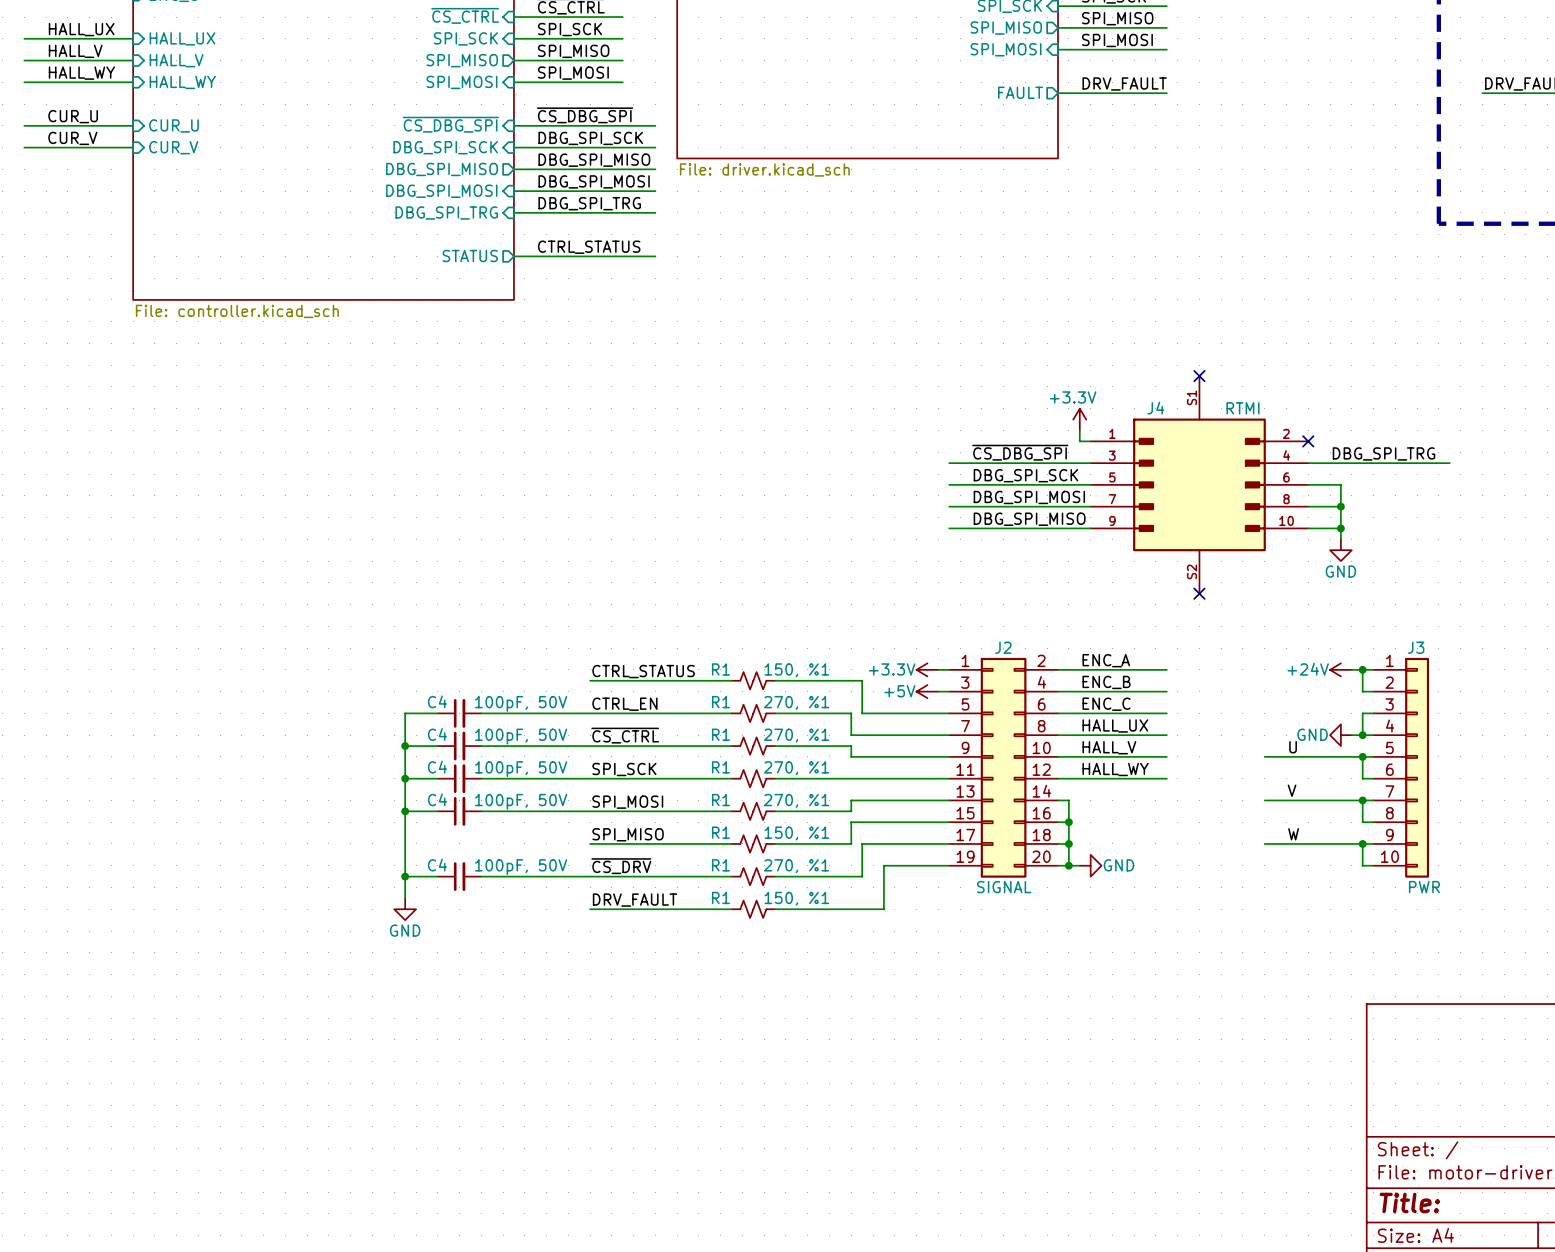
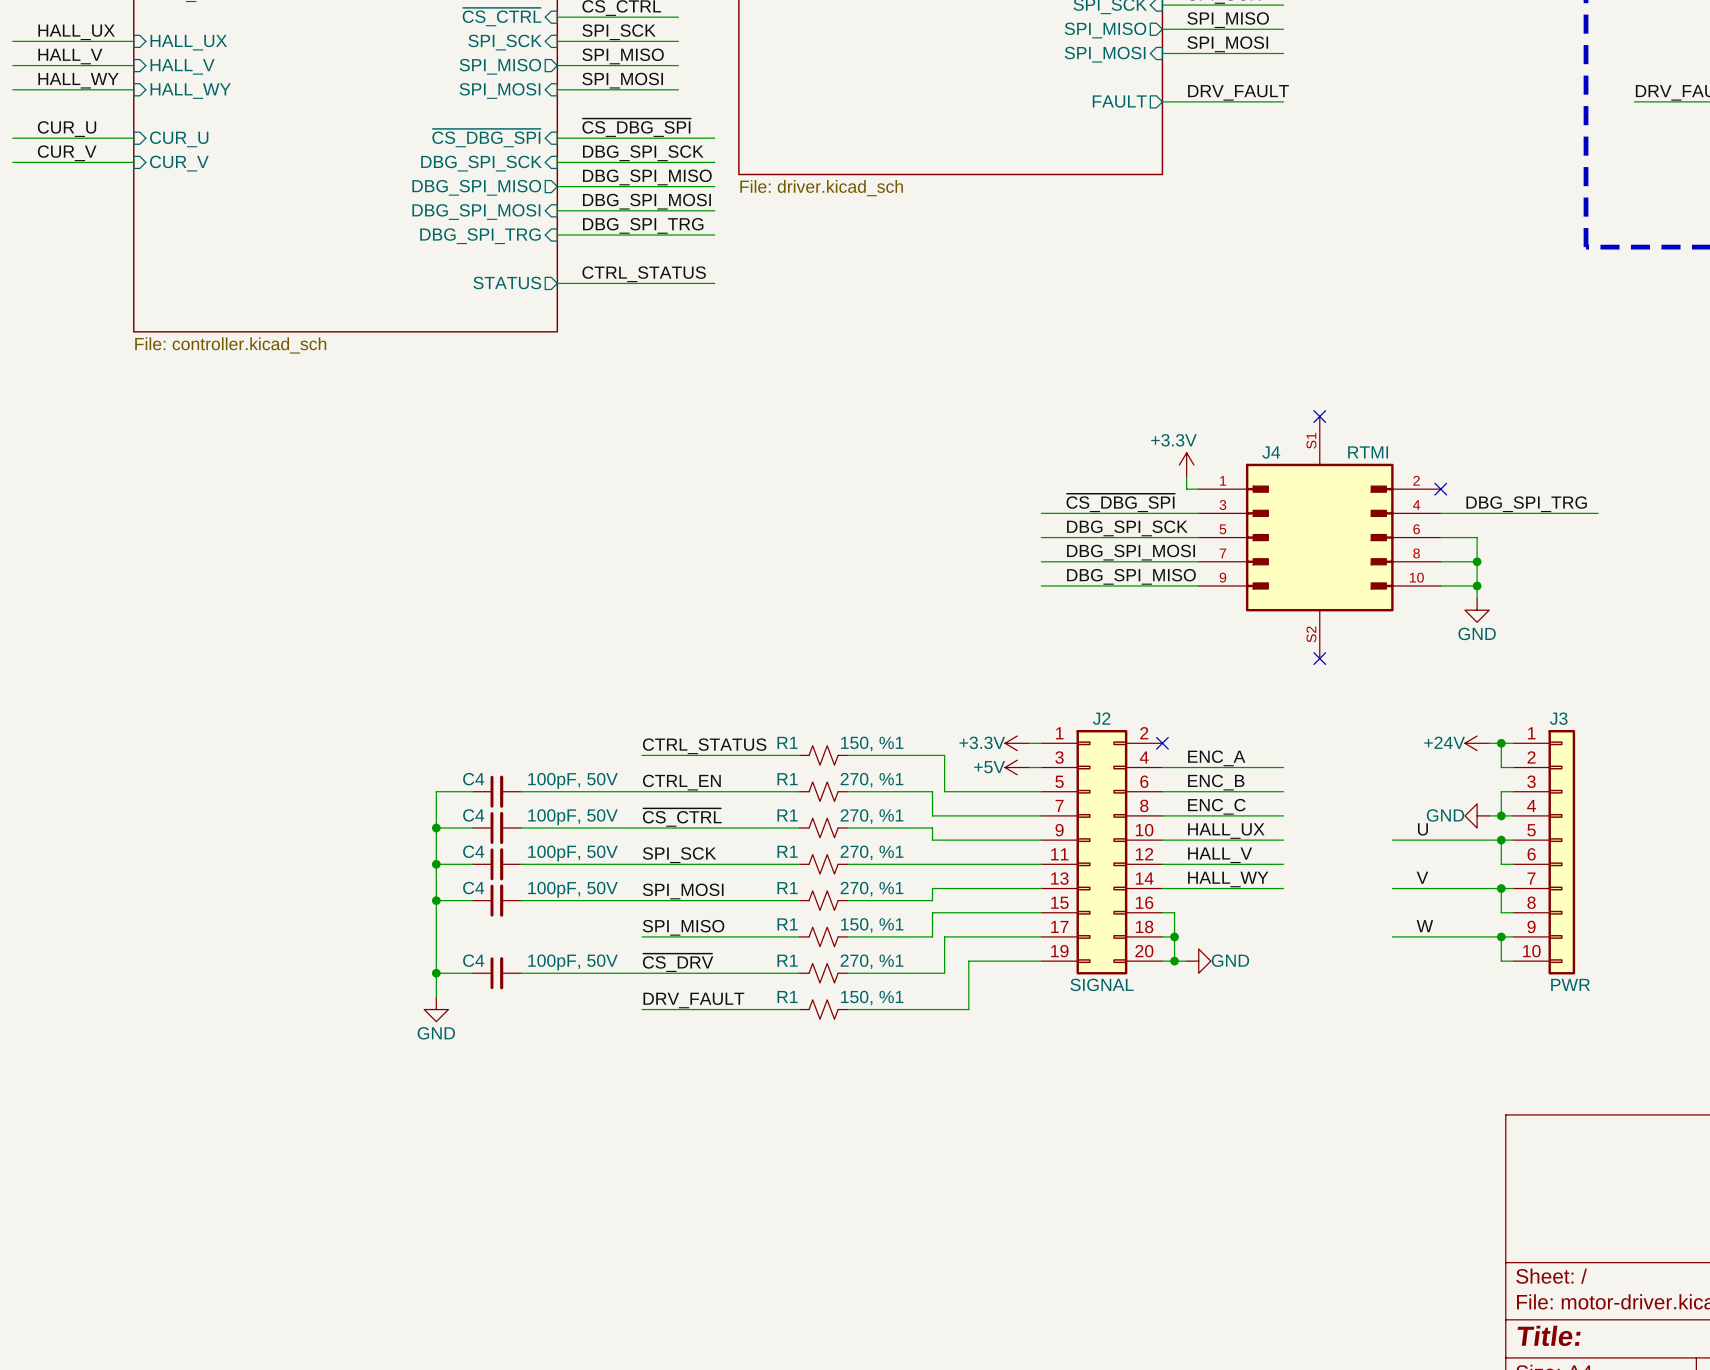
label: ENC_A (1106, 660) -> none
wire: (1058, 669) (1166, 669) -> none
no-connect mark: none -> (1162, 743)
label: ENC_B (1106, 682) -> ENC_A (1216, 758)
label: ENC_C (1106, 704) -> ENC_B (1216, 782)
label: HALL_UX (1115, 725) -> ENC_C (1216, 806)
label: HALL_V (1109, 747) -> HALL_UX (1226, 831)
label: HALL_WY (1115, 769) -> HALL_V (1220, 855)
label: none -> HALL_WY (1228, 879)
wire: (1068, 800) (1068, 822) -> (1174, 888) (1283, 888)
junction: (1068, 822) -> none

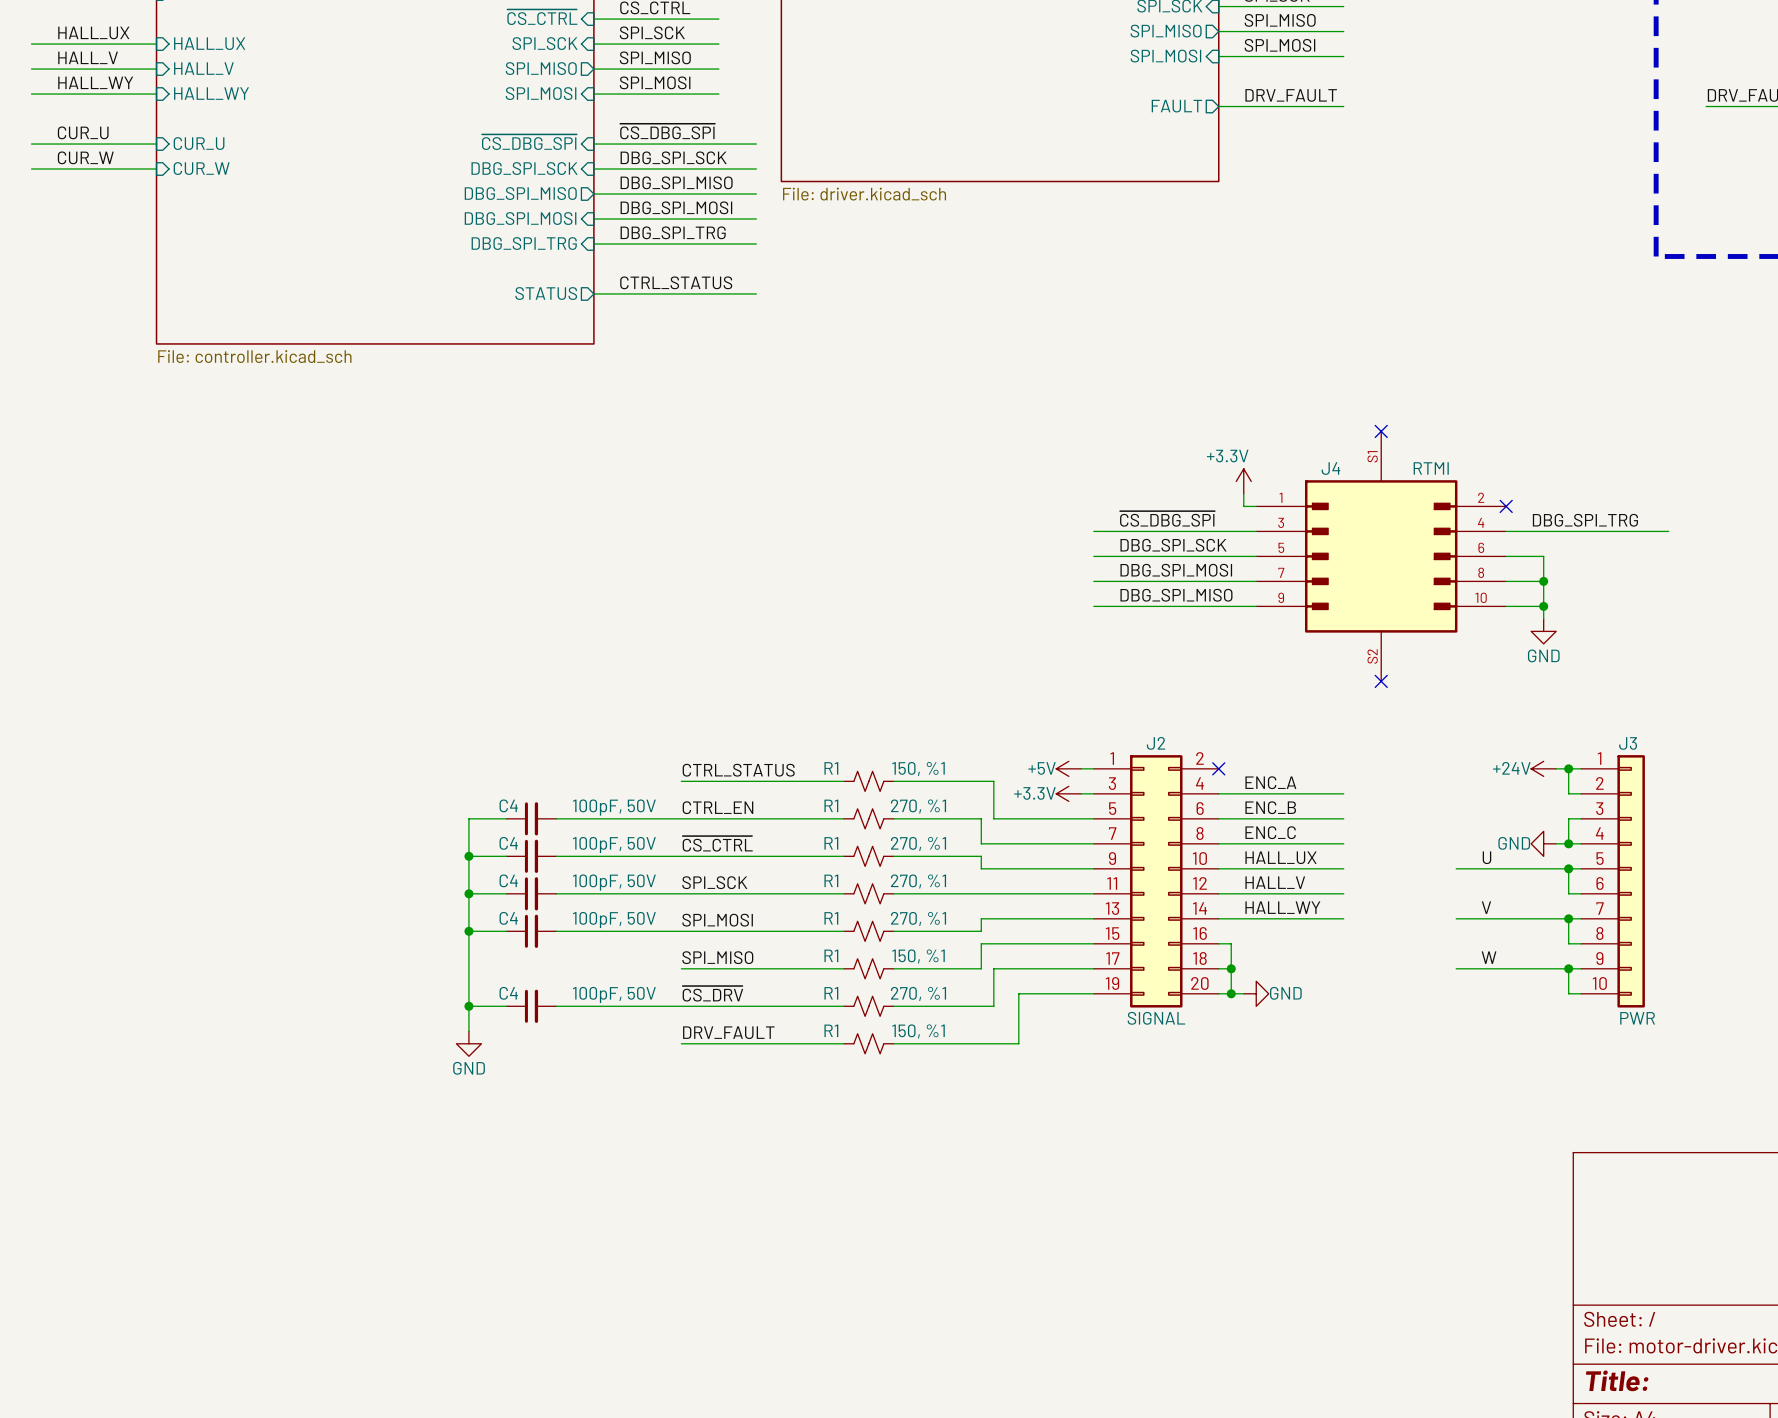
label: CUR_V (67, 153) -> CUR_W (85, 157)
sheet pin: CUR_V (179, 163) -> CUR_W (201, 168)
power symbol: +3.3V (1017, 743) -> +5V (1068, 768)
power symbol: +5V (1017, 767) -> +3.3V (1068, 793)

